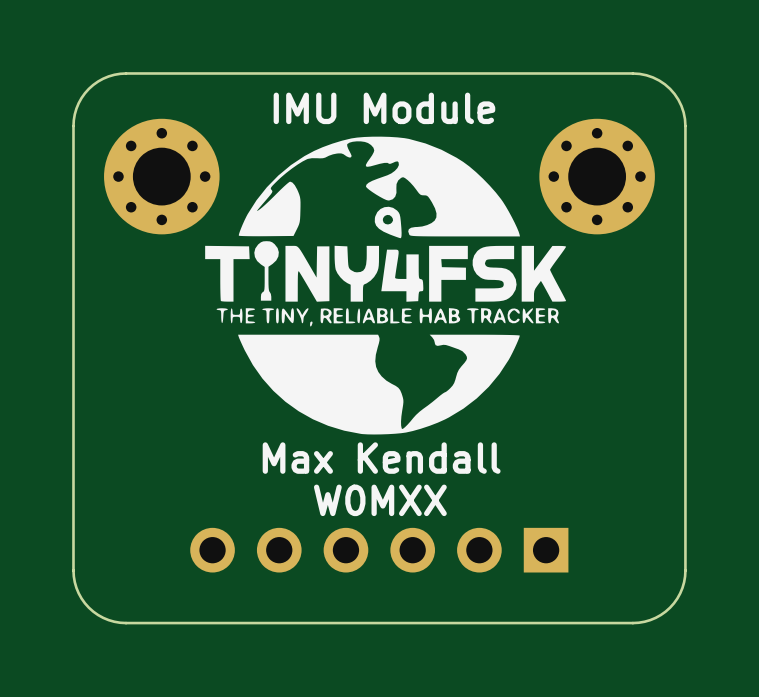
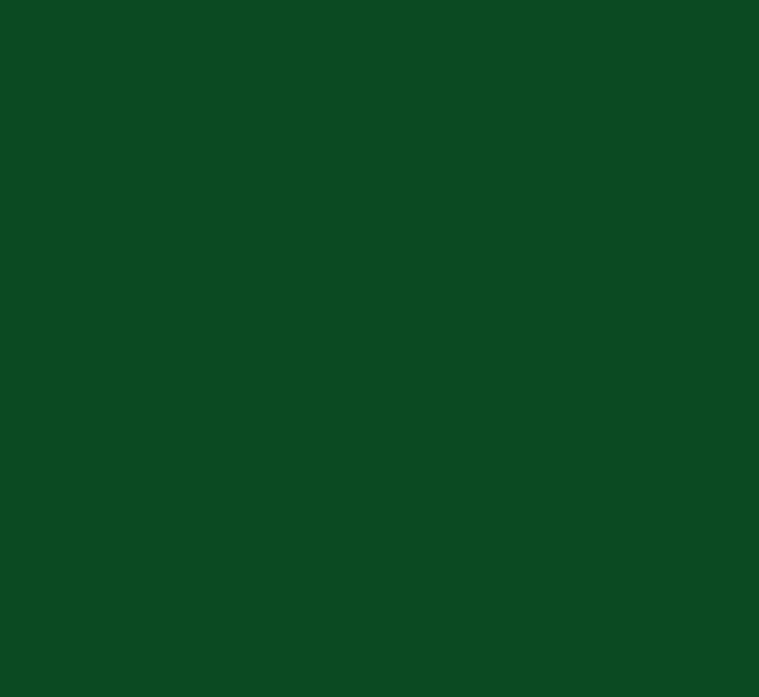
board edge: (632, 73) (126, 73) (108, 76) (88, 88) (78, 103) (73, 126) (73, 570) (78, 593) (88, 607) (103, 617) (126, 623) (632, 623) (650, 620) (670, 607) (680, 593) (685, 570) (684, 119) (678, 99) (670, 88) (653, 77) (632, 73) -> none
text: IMU Module (384, 108) -> none
drawing: [205, 136, 567, 435] -> none
part: (161, 176) -> none
part: (597, 176) -> none
text: Max Kendall (381, 458) -> none
text: W0MXX (380, 500) -> none
part: (379, 550) -> none

